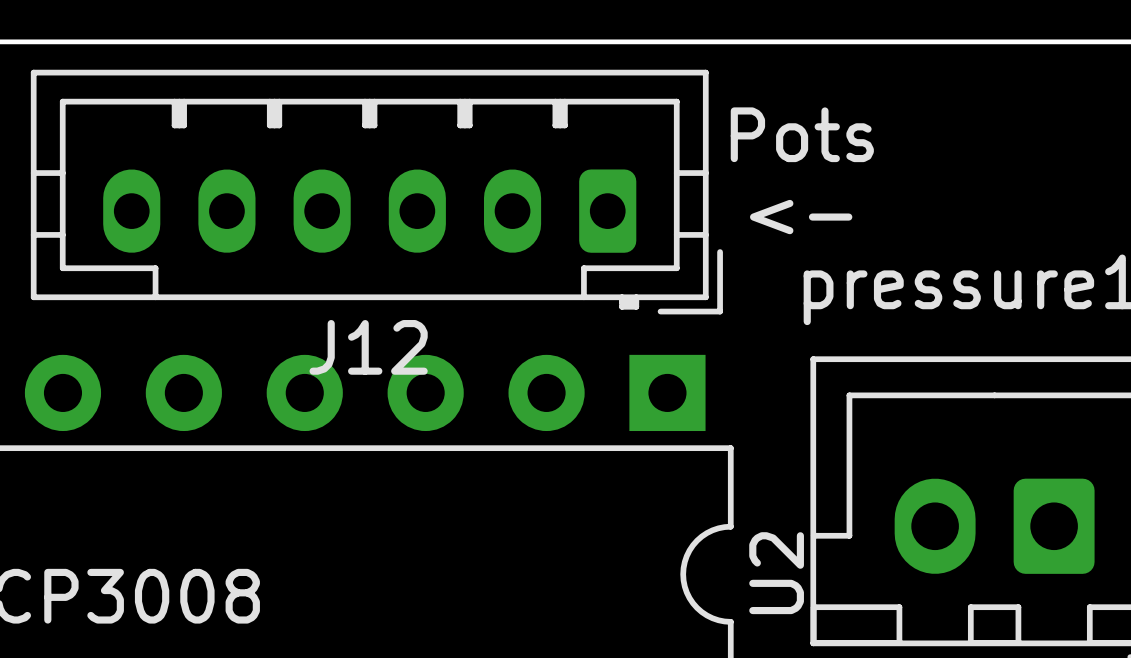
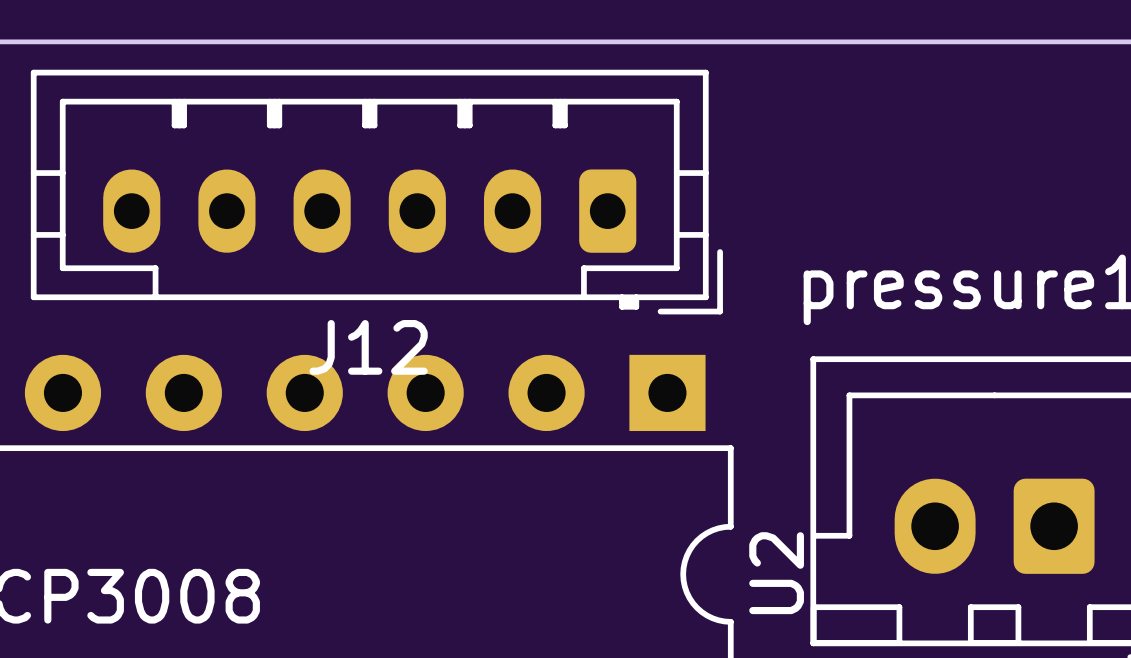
text: Pots (802, 134) -> none
text: <- (801, 217) -> none

